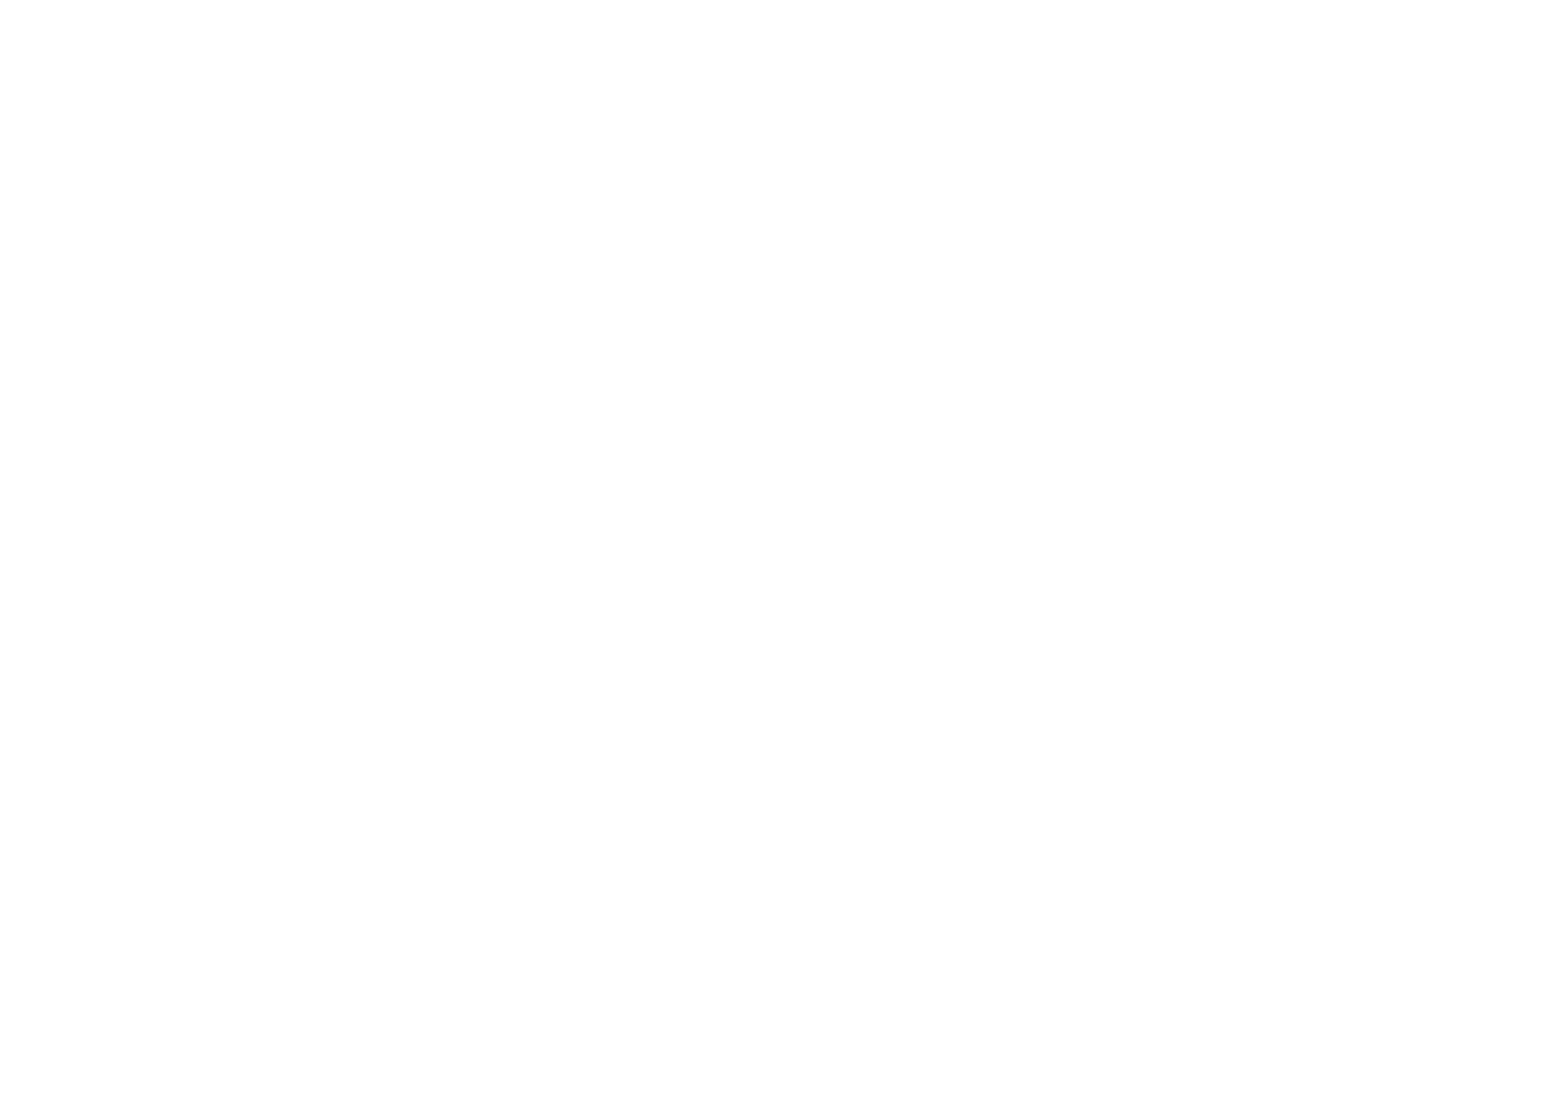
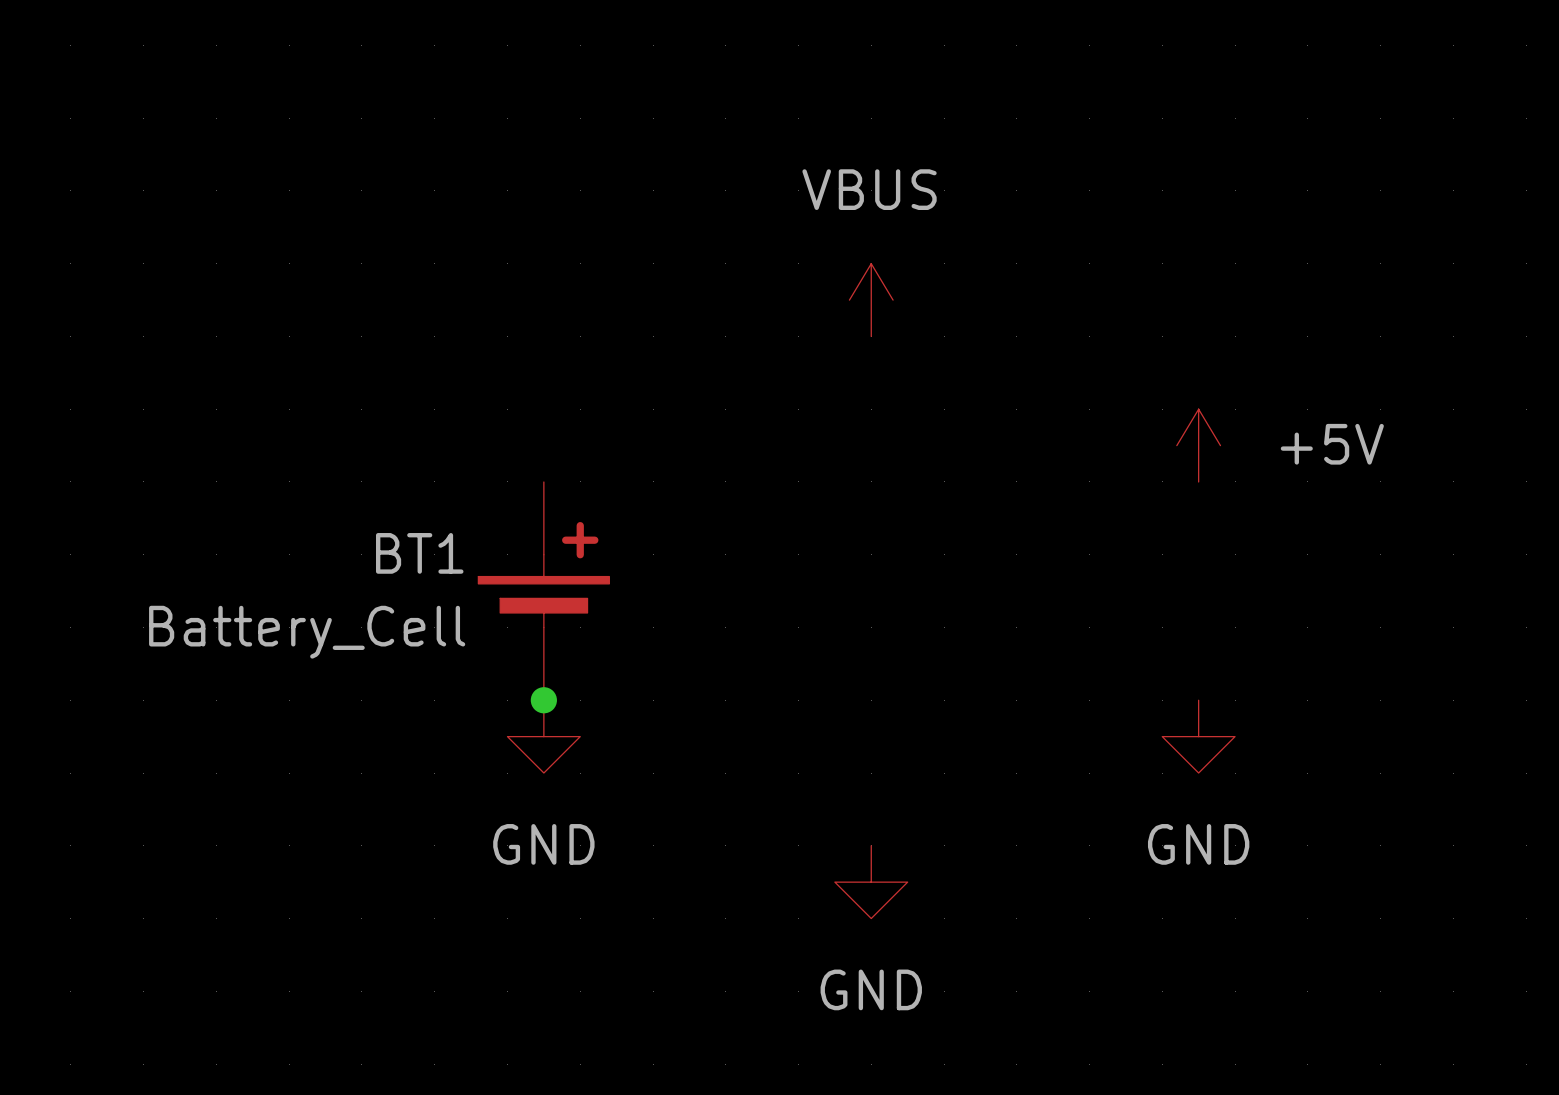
power symbol: none -> VBUS (871, 300)
power symbol: none -> +5V (1198, 445)
BT1: none -> Battery_Cell (543, 591)
junction: none -> (543, 700)
power symbol: none -> GND (543, 736)
power symbol: none -> GND (1198, 736)
power symbol: none -> GND (871, 882)

